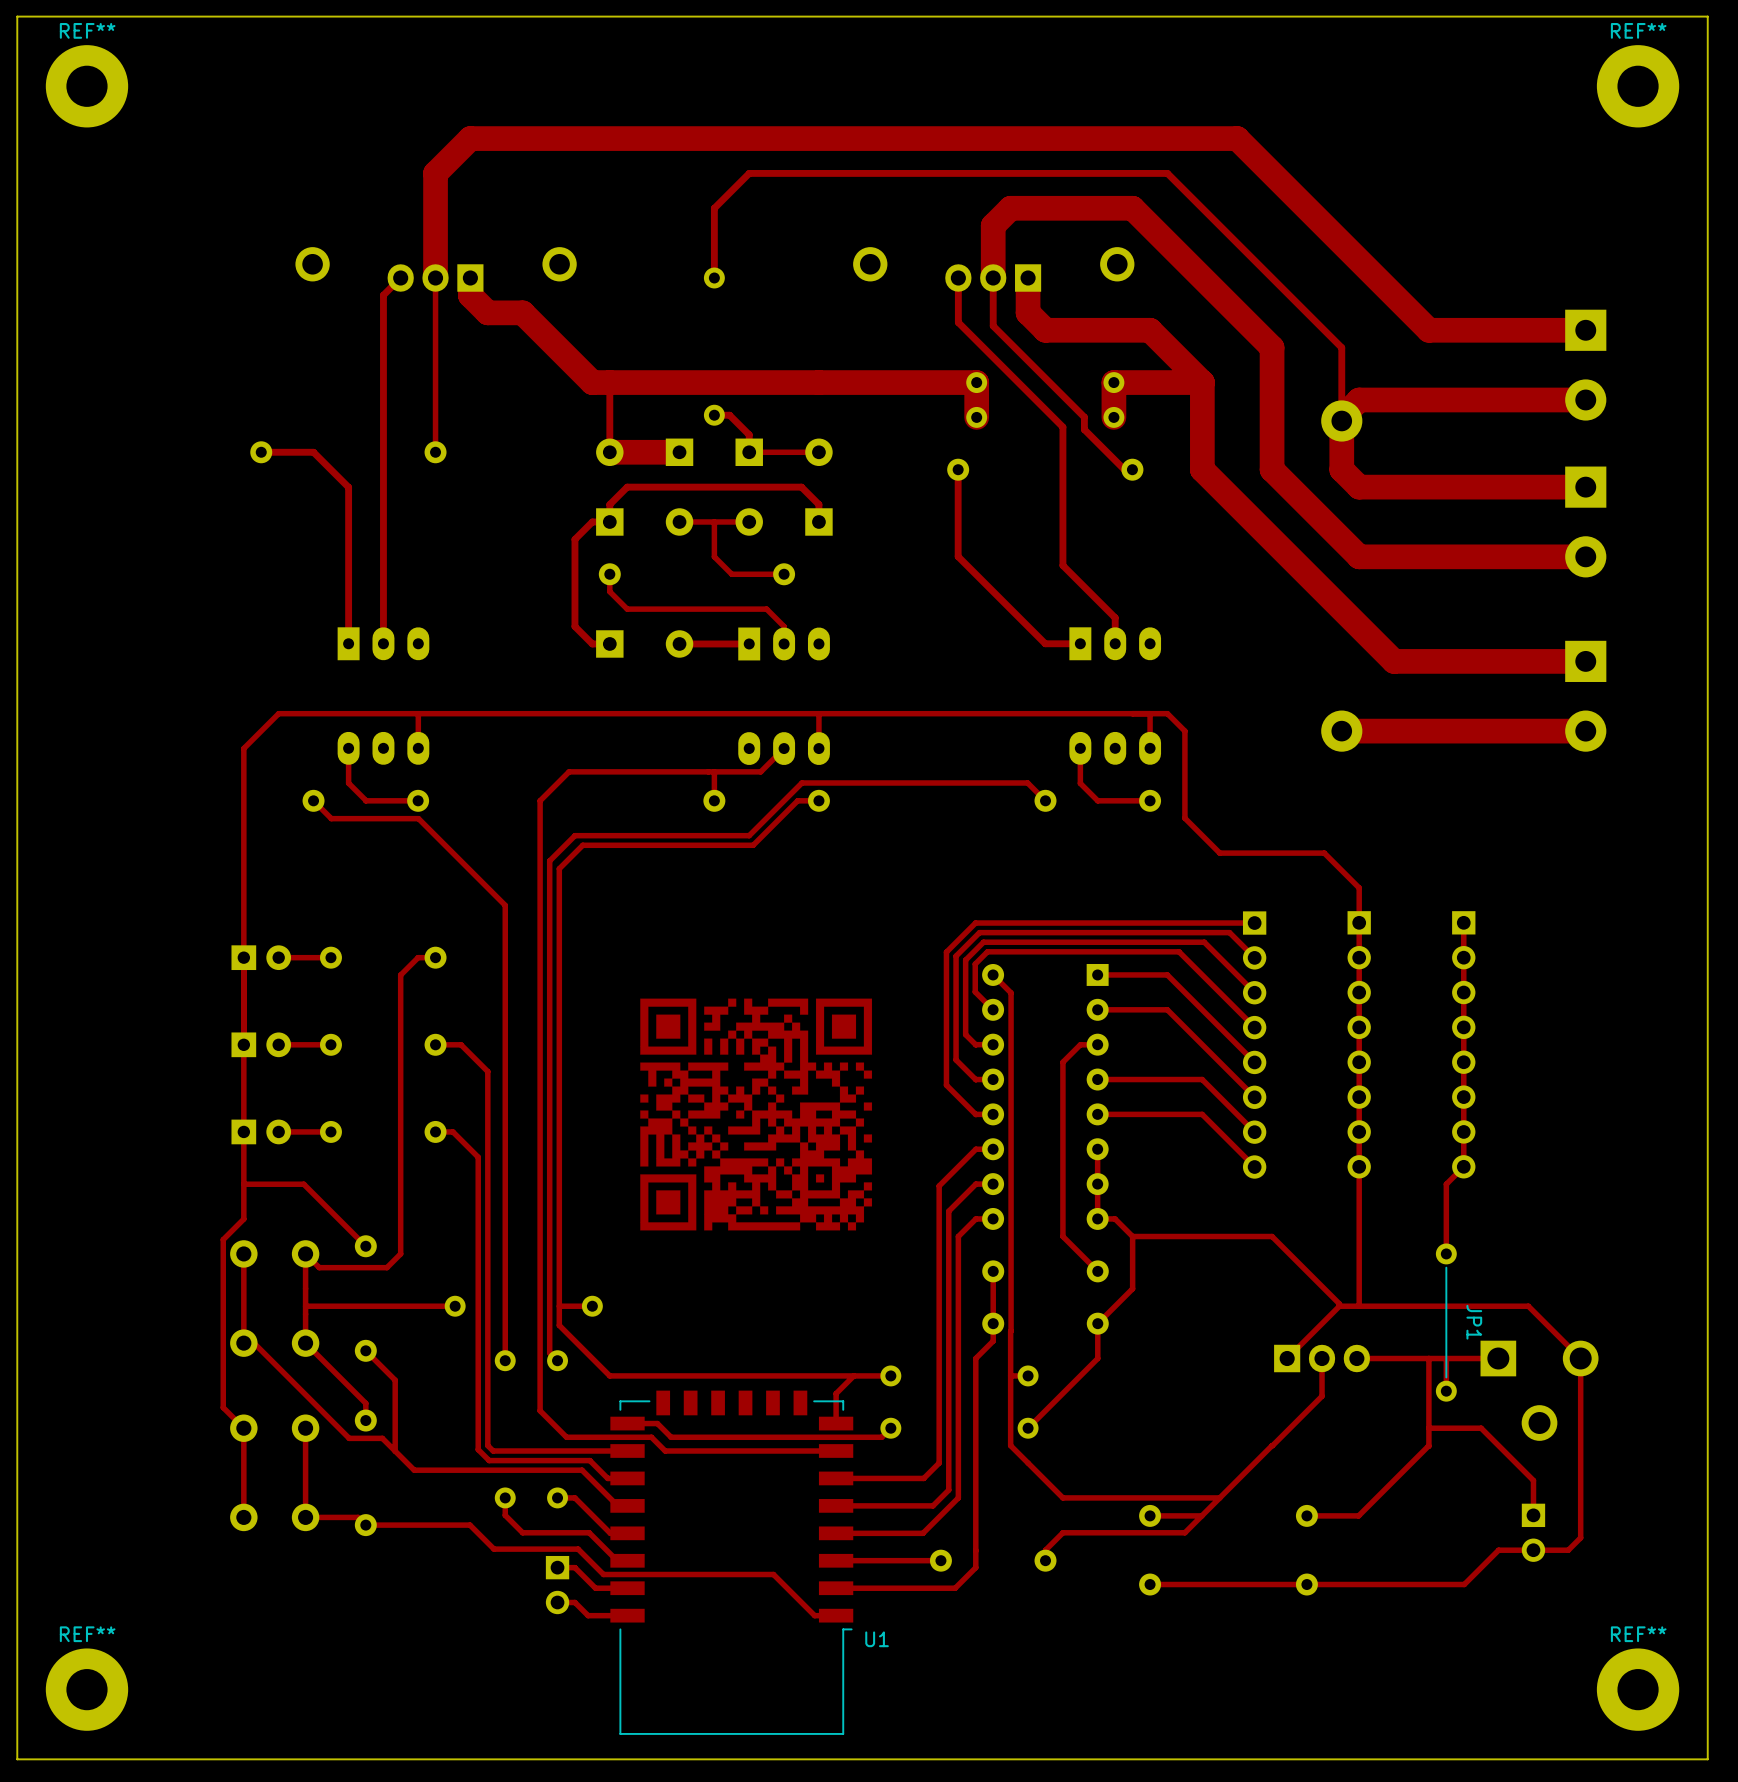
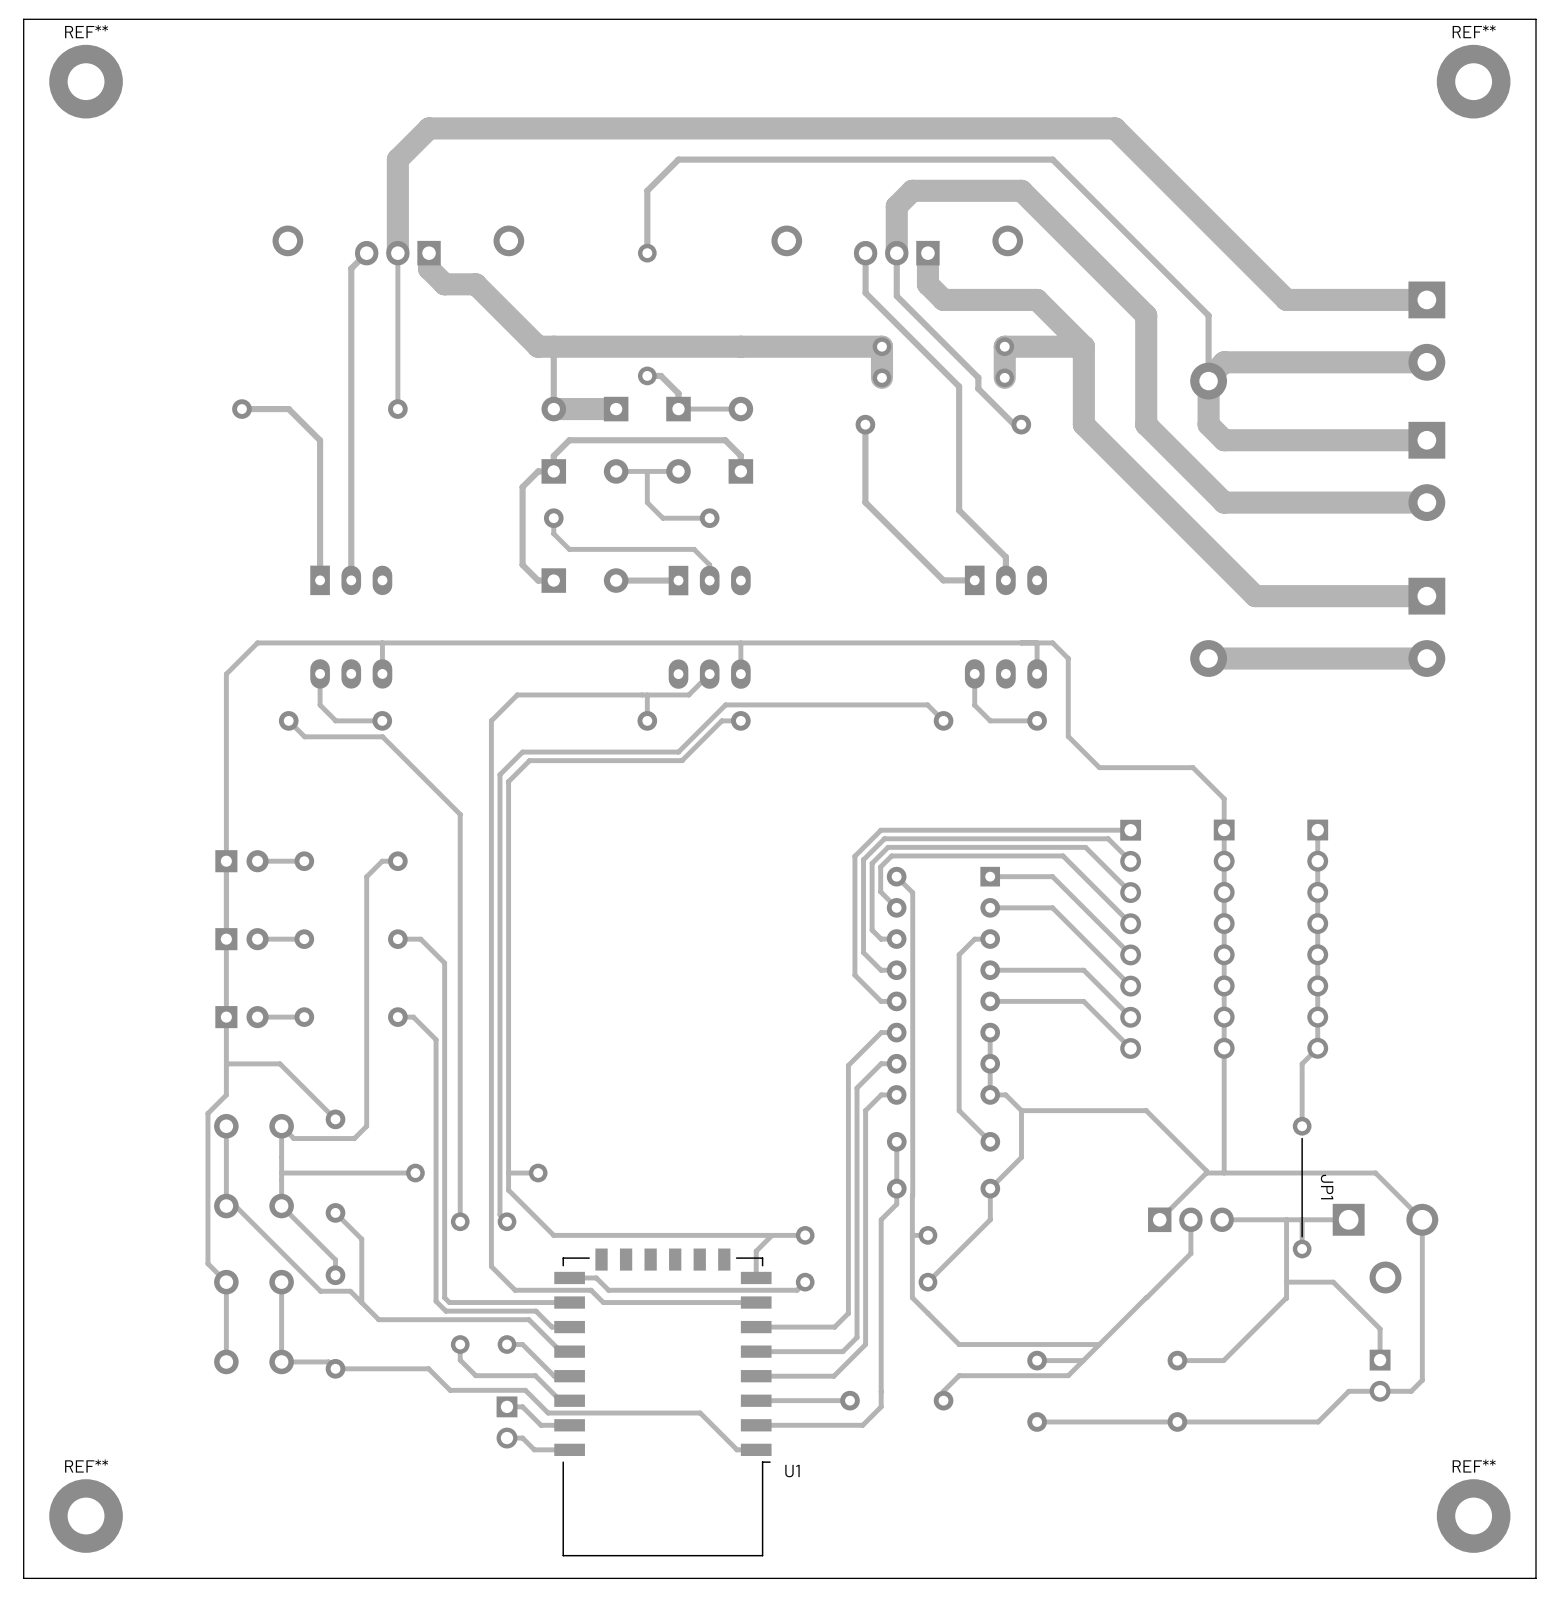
drawing: [640, 998, 873, 1231] -> none

